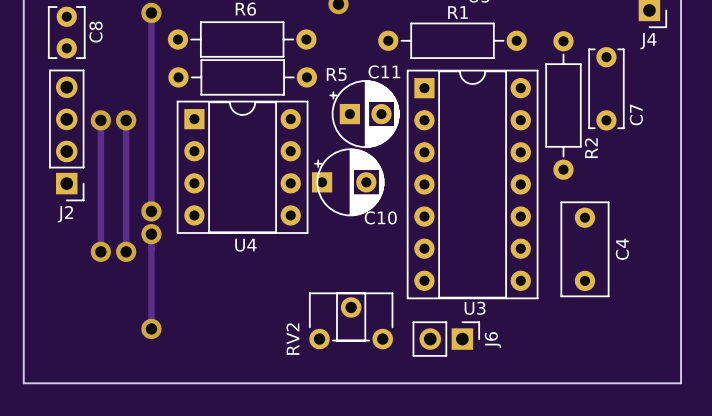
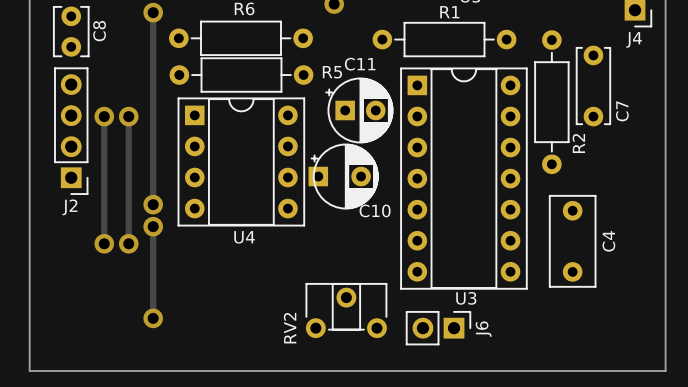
C11 name position: C11 (384, 71) -> C11 (360, 64)

